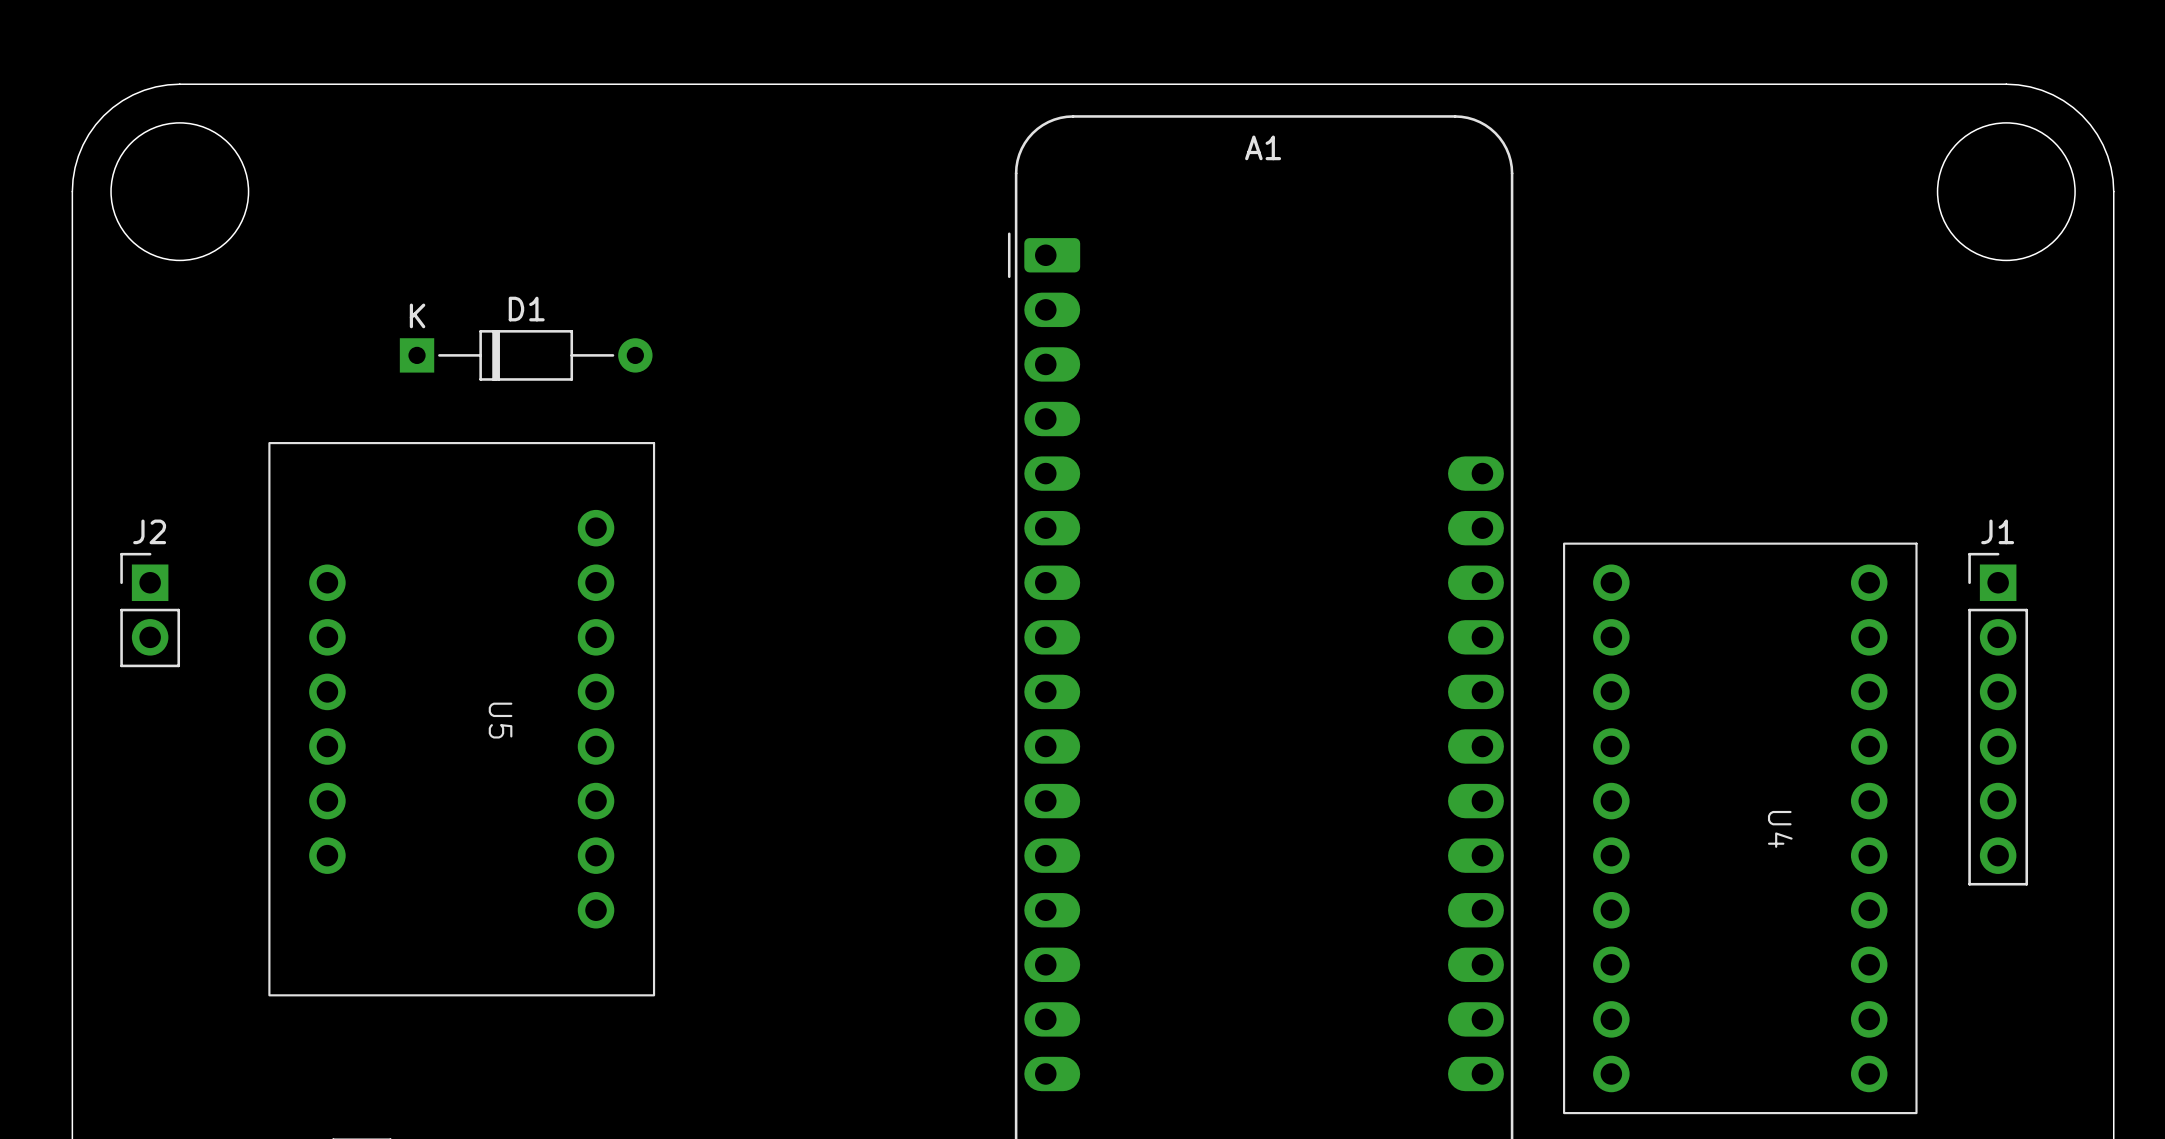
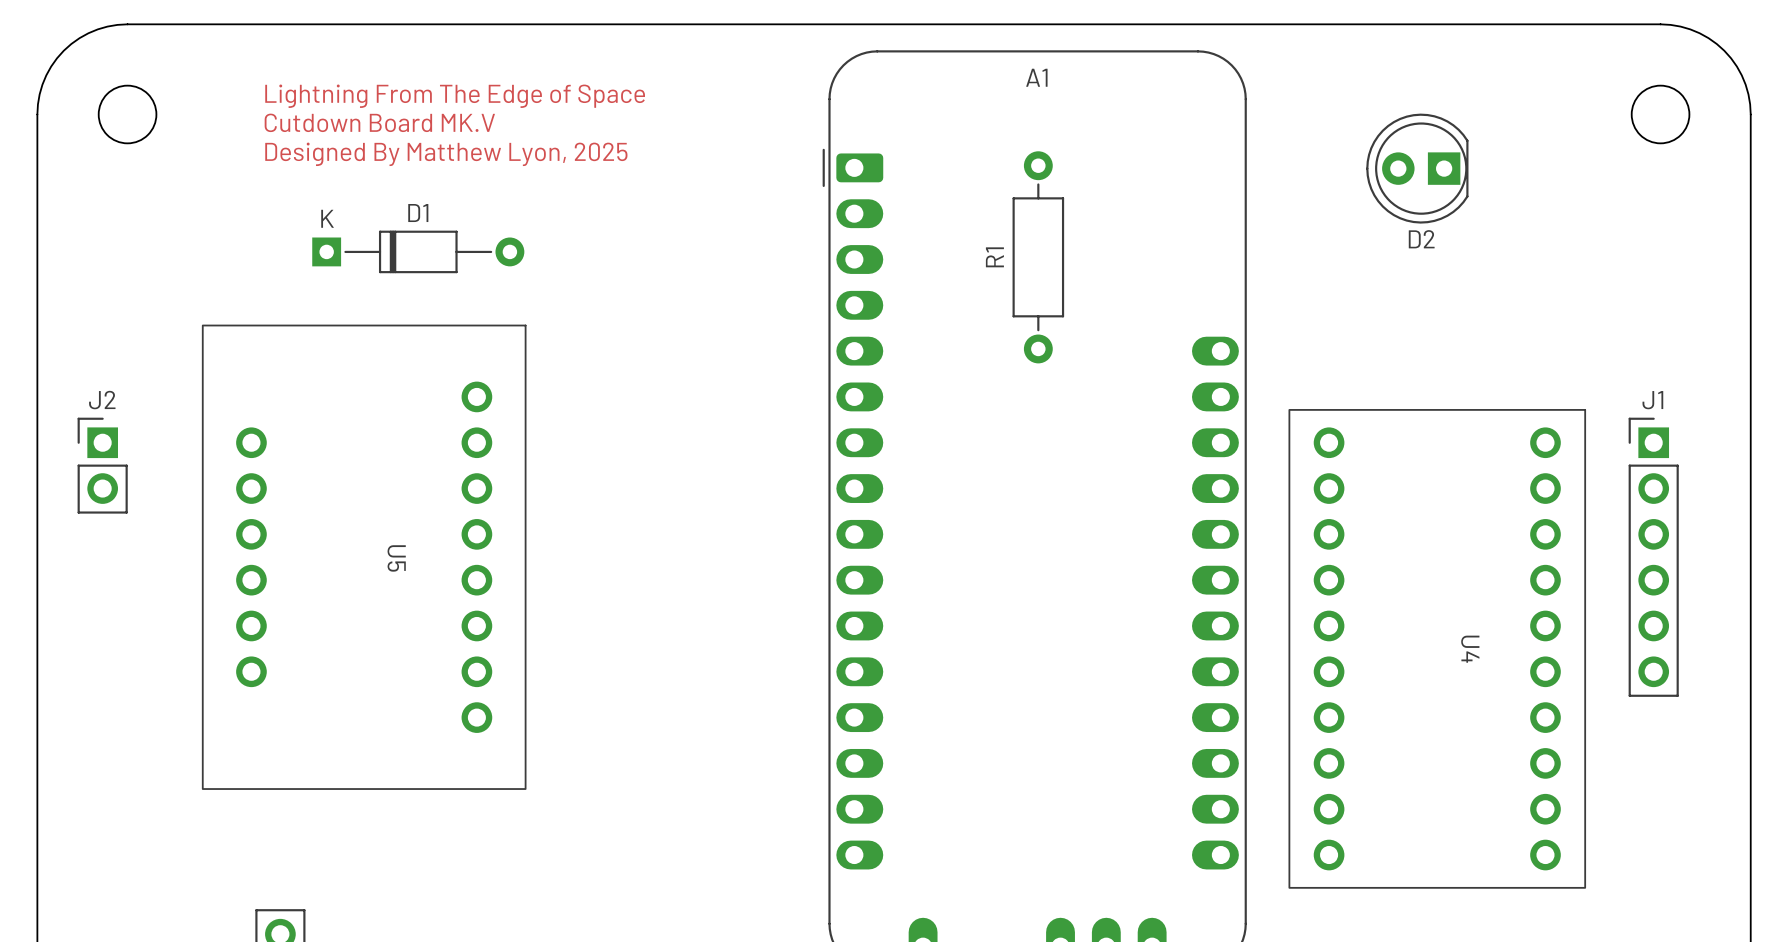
round board edge size: [110, 122, 250, 261] -> [98, 85, 157, 144]
round board edge size: [1937, 122, 2076, 261] -> [1631, 85, 1690, 144]
text: none -> Lightning From The Edge of Space (455, 96)
text: none -> Cutdown Board MK.V (379, 122)
text: none -> Designed By Matthew Lyon, 2025 (446, 154)
D2: none -> (1417, 168)
R1: none -> (1038, 257)

